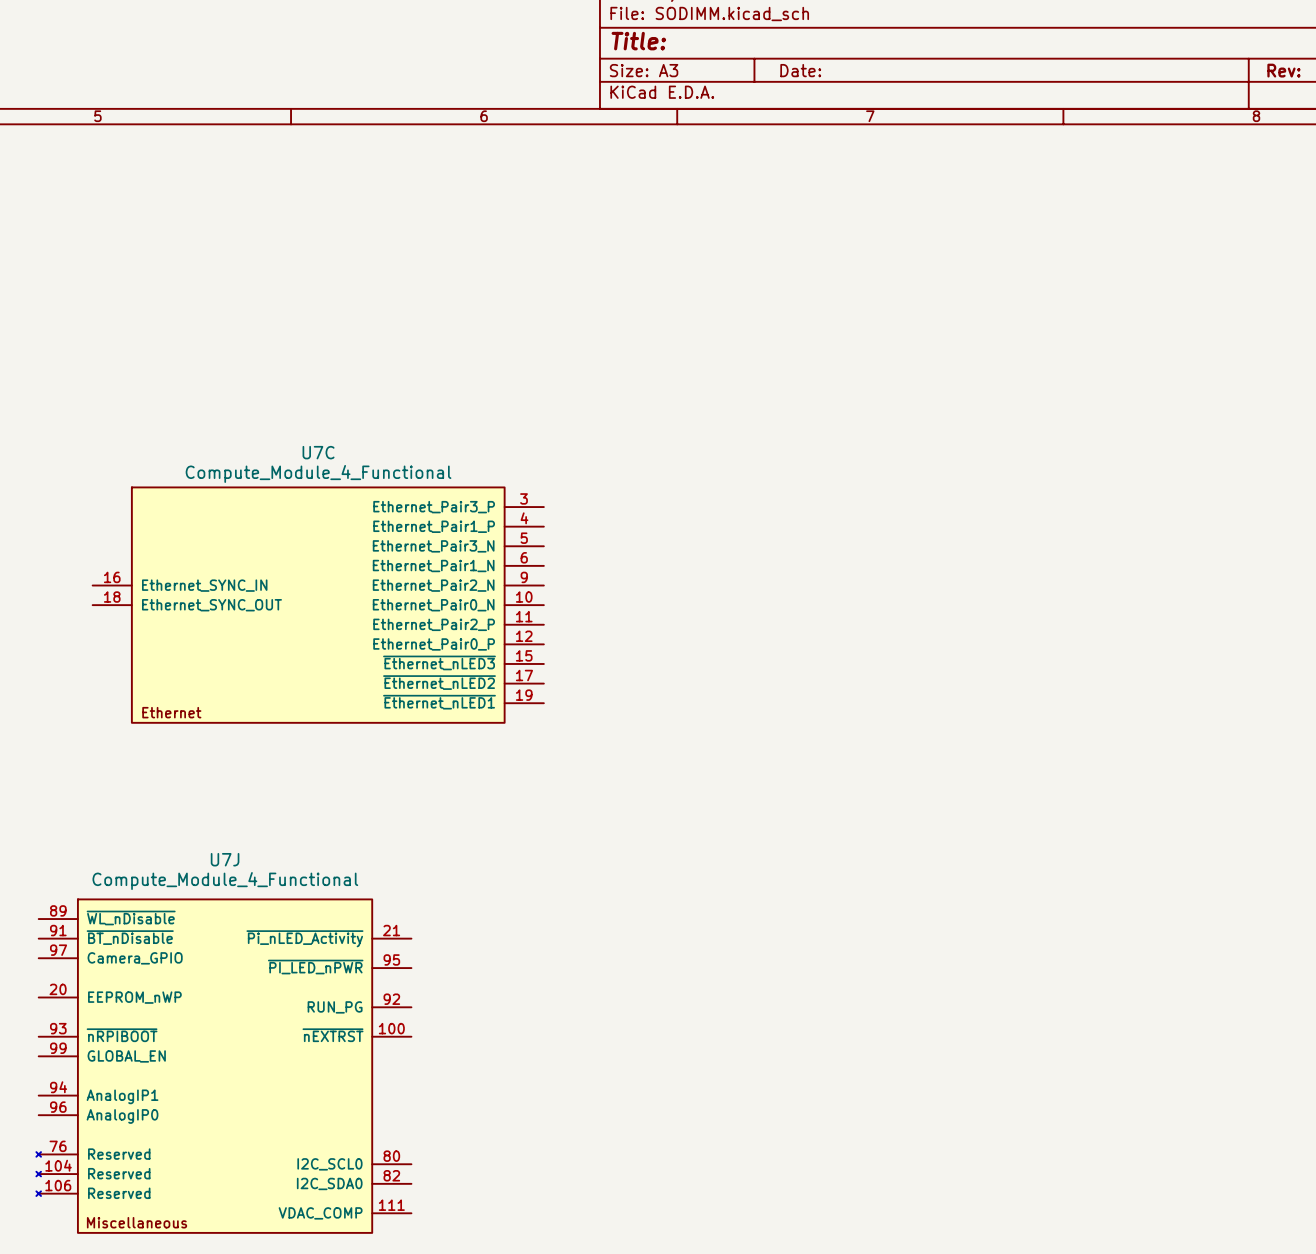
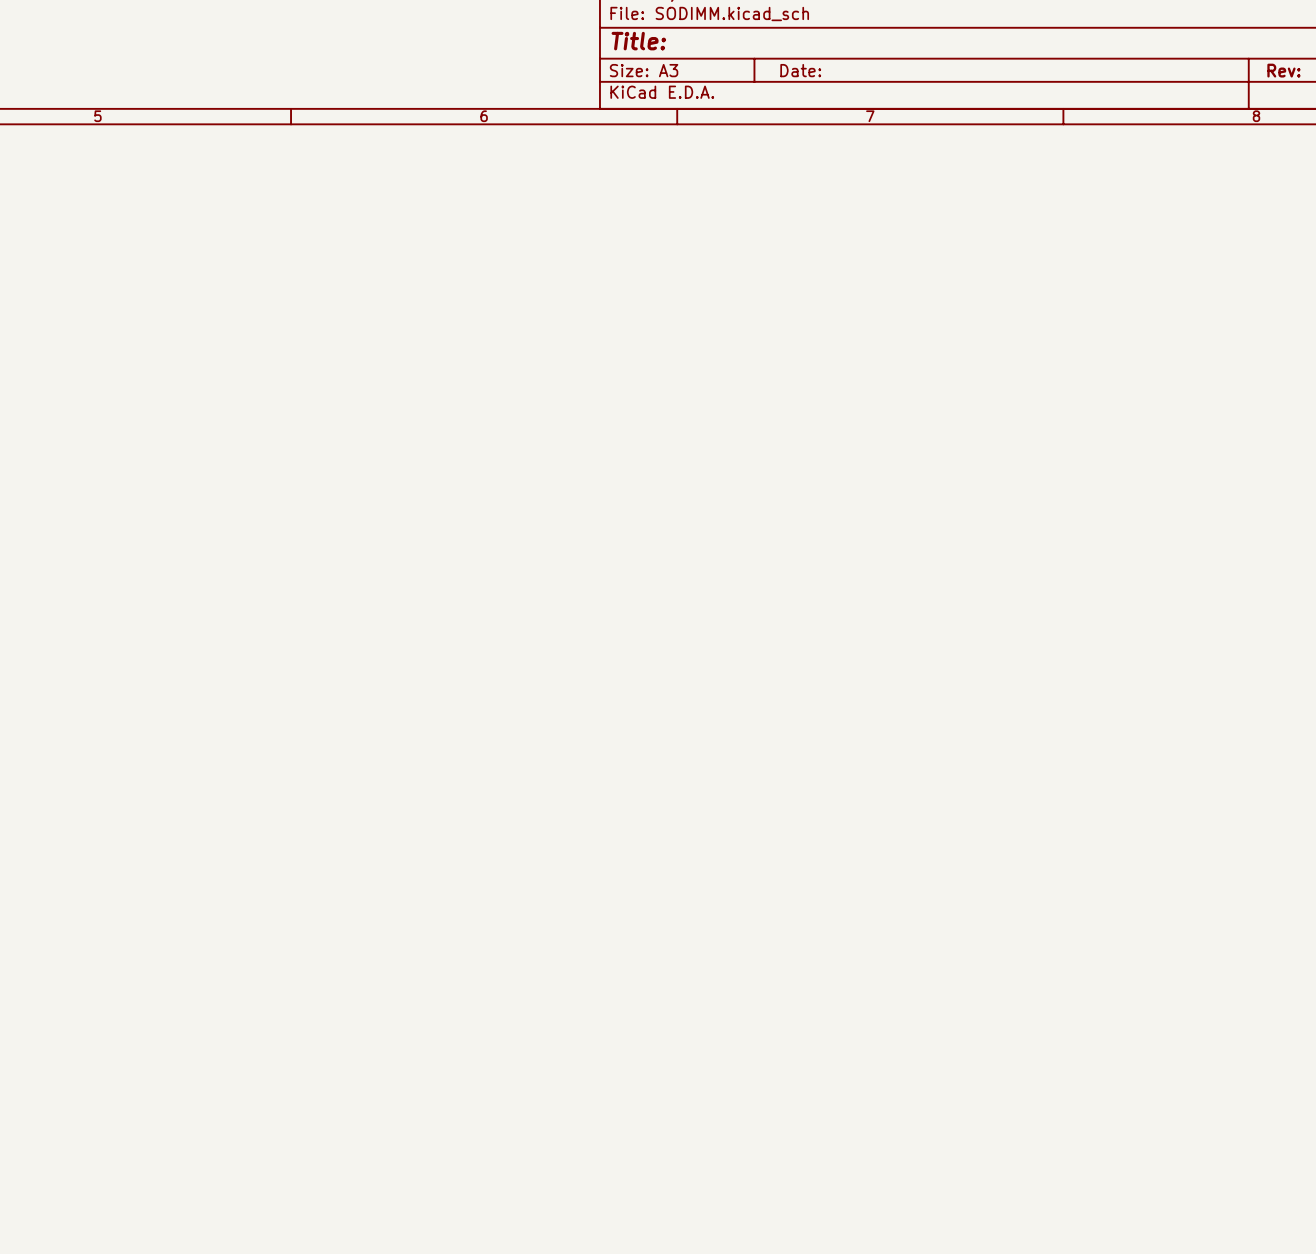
U7C: Compute_Module_4_Functional (318, 605) -> none
U7J: Compute_Module_4_Functional (223, 1066) -> none

